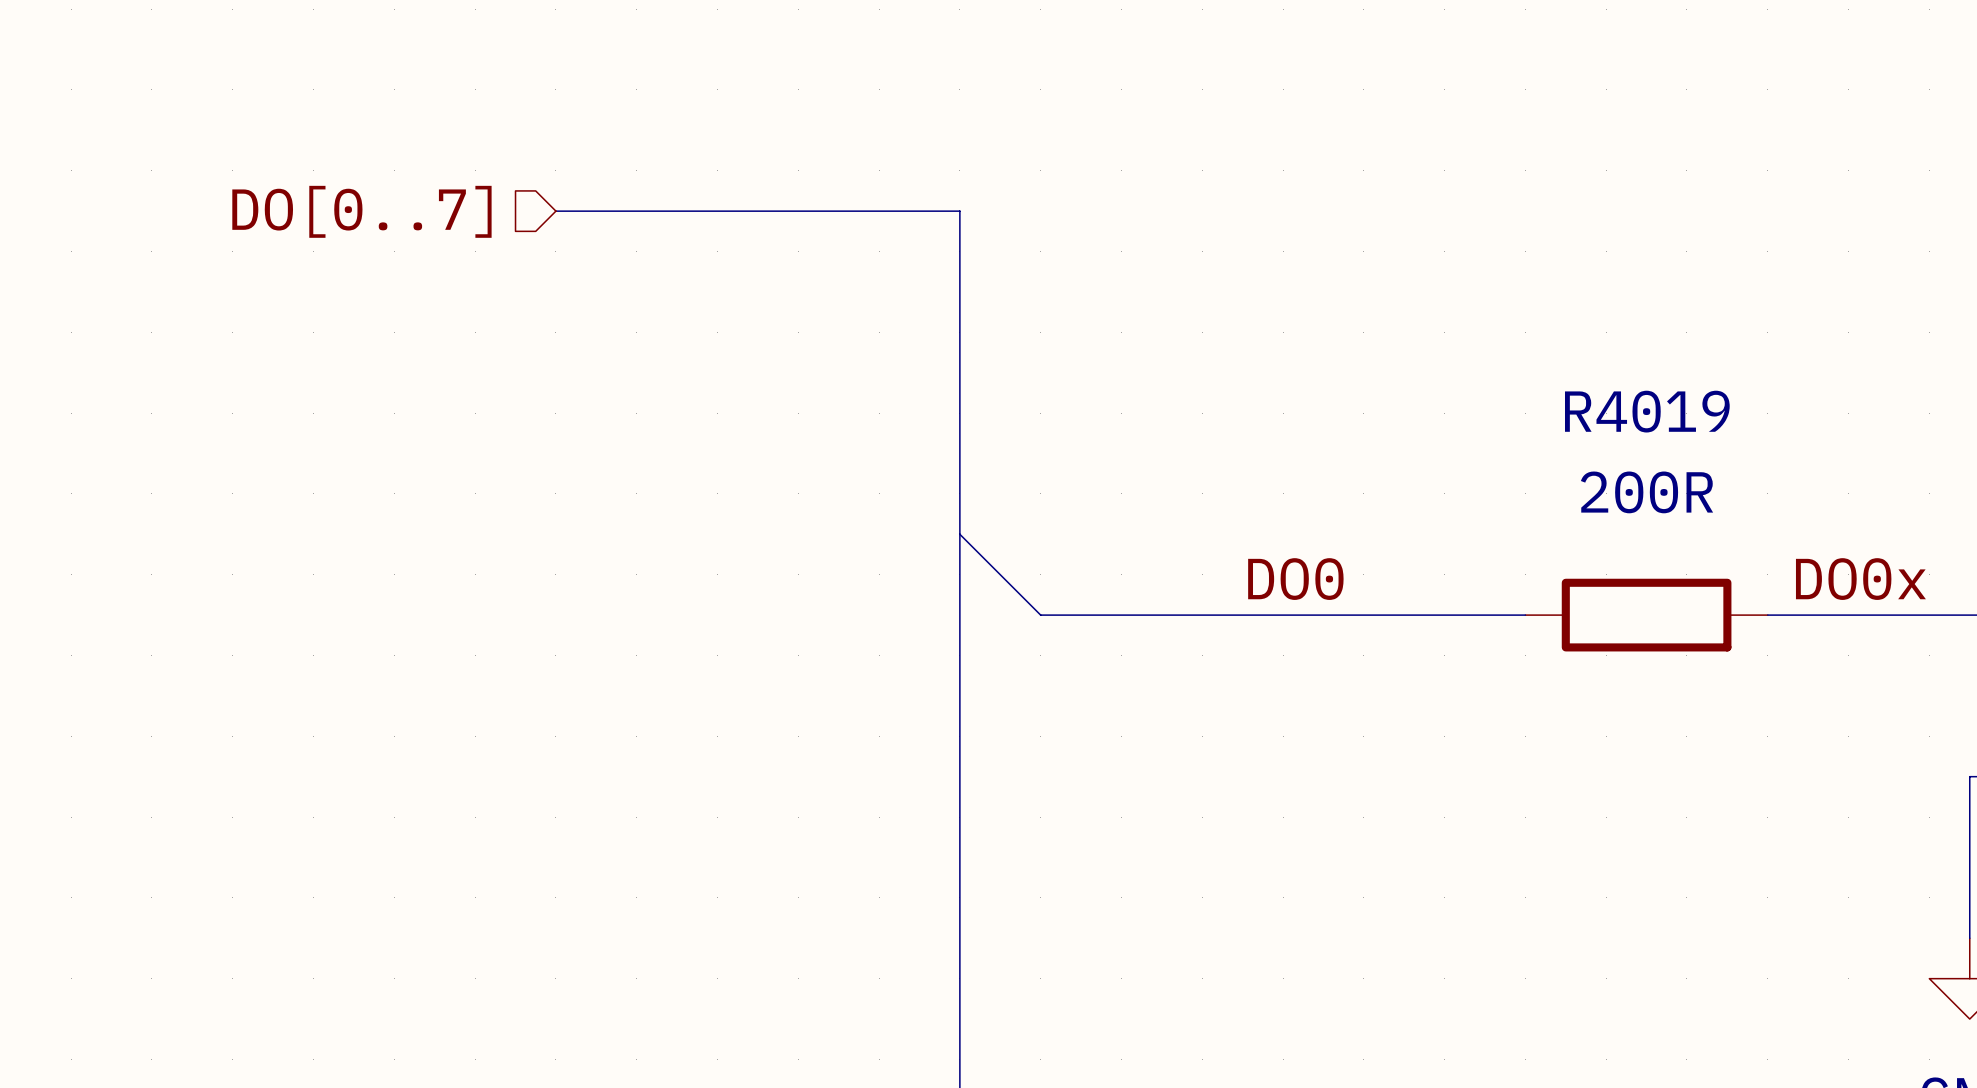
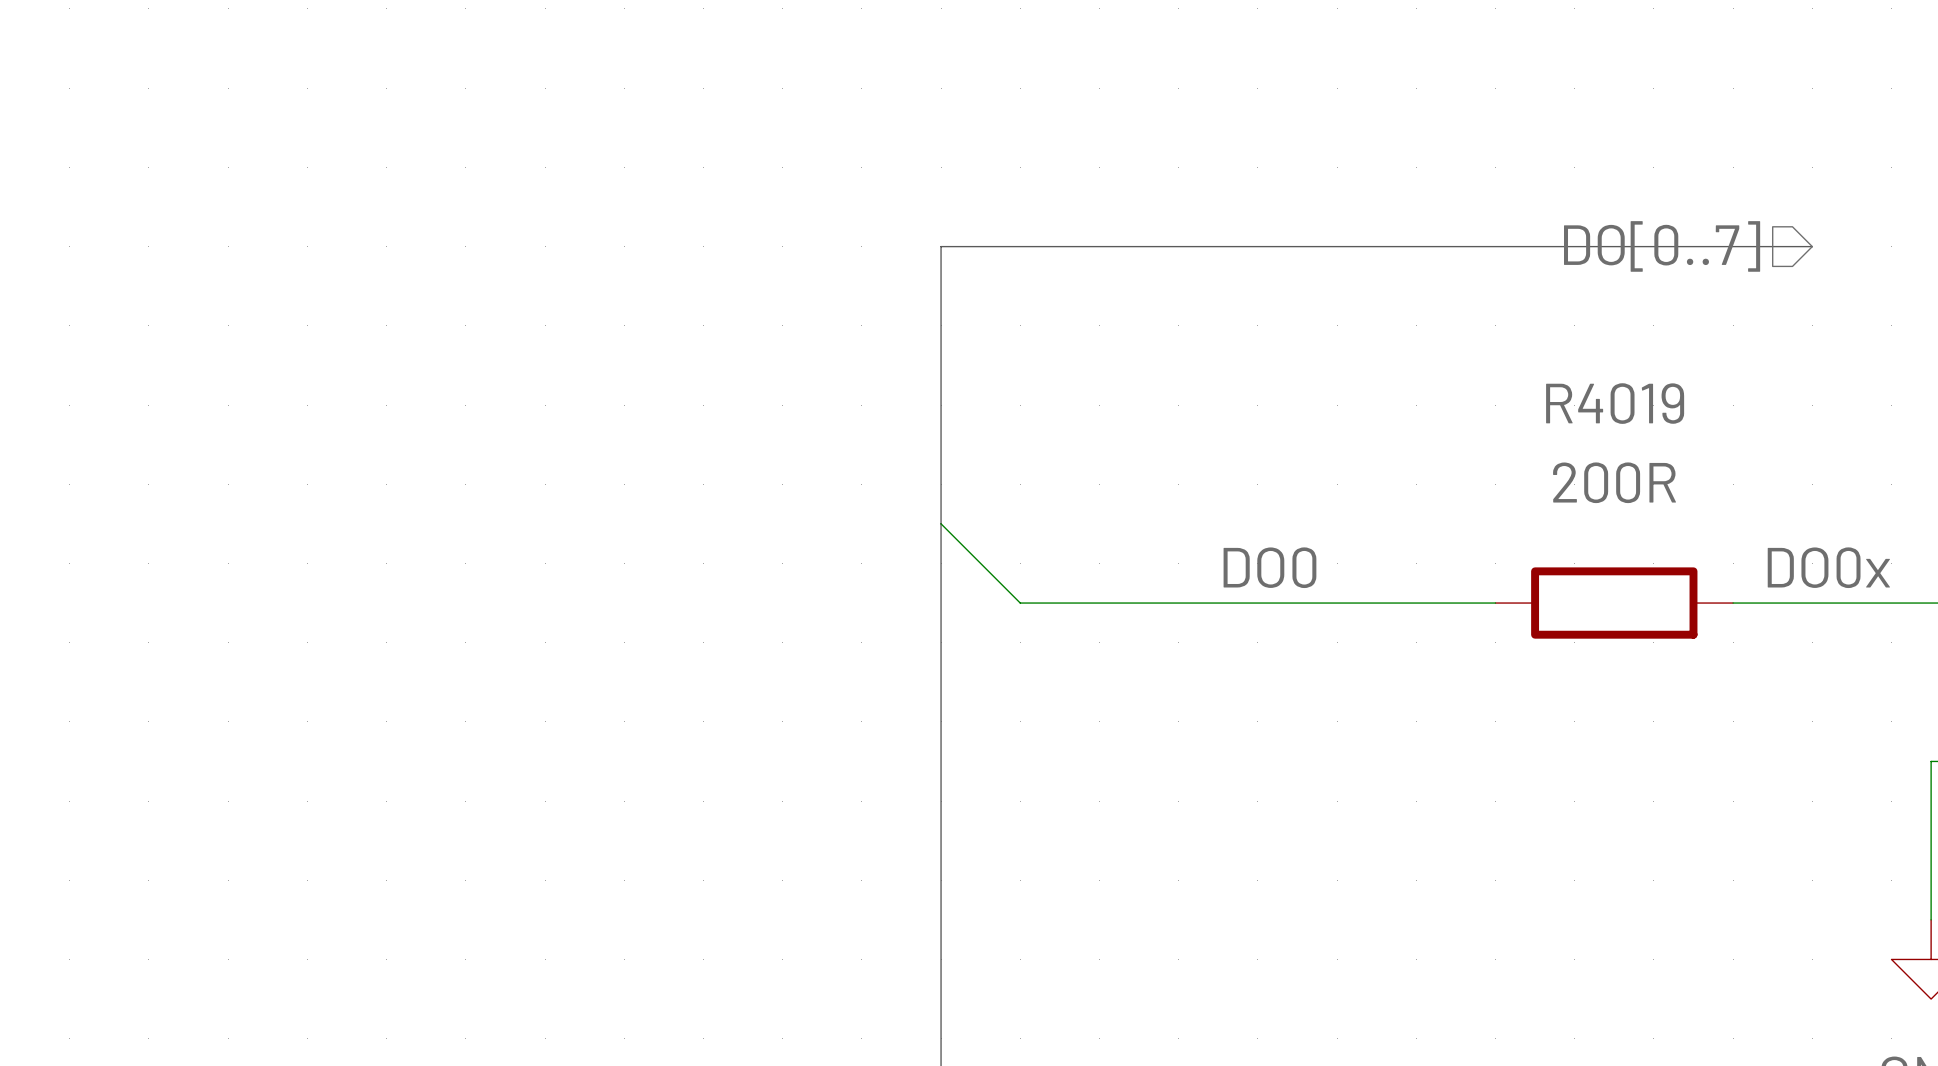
hierarchical label: DO[0..7] (361, 211) -> none
bus: (555, 211) (959, 211) (959, 251) -> (1812, 246) (941, 246)
hierarchical label: none -> DO[0..7] (1662, 246)

